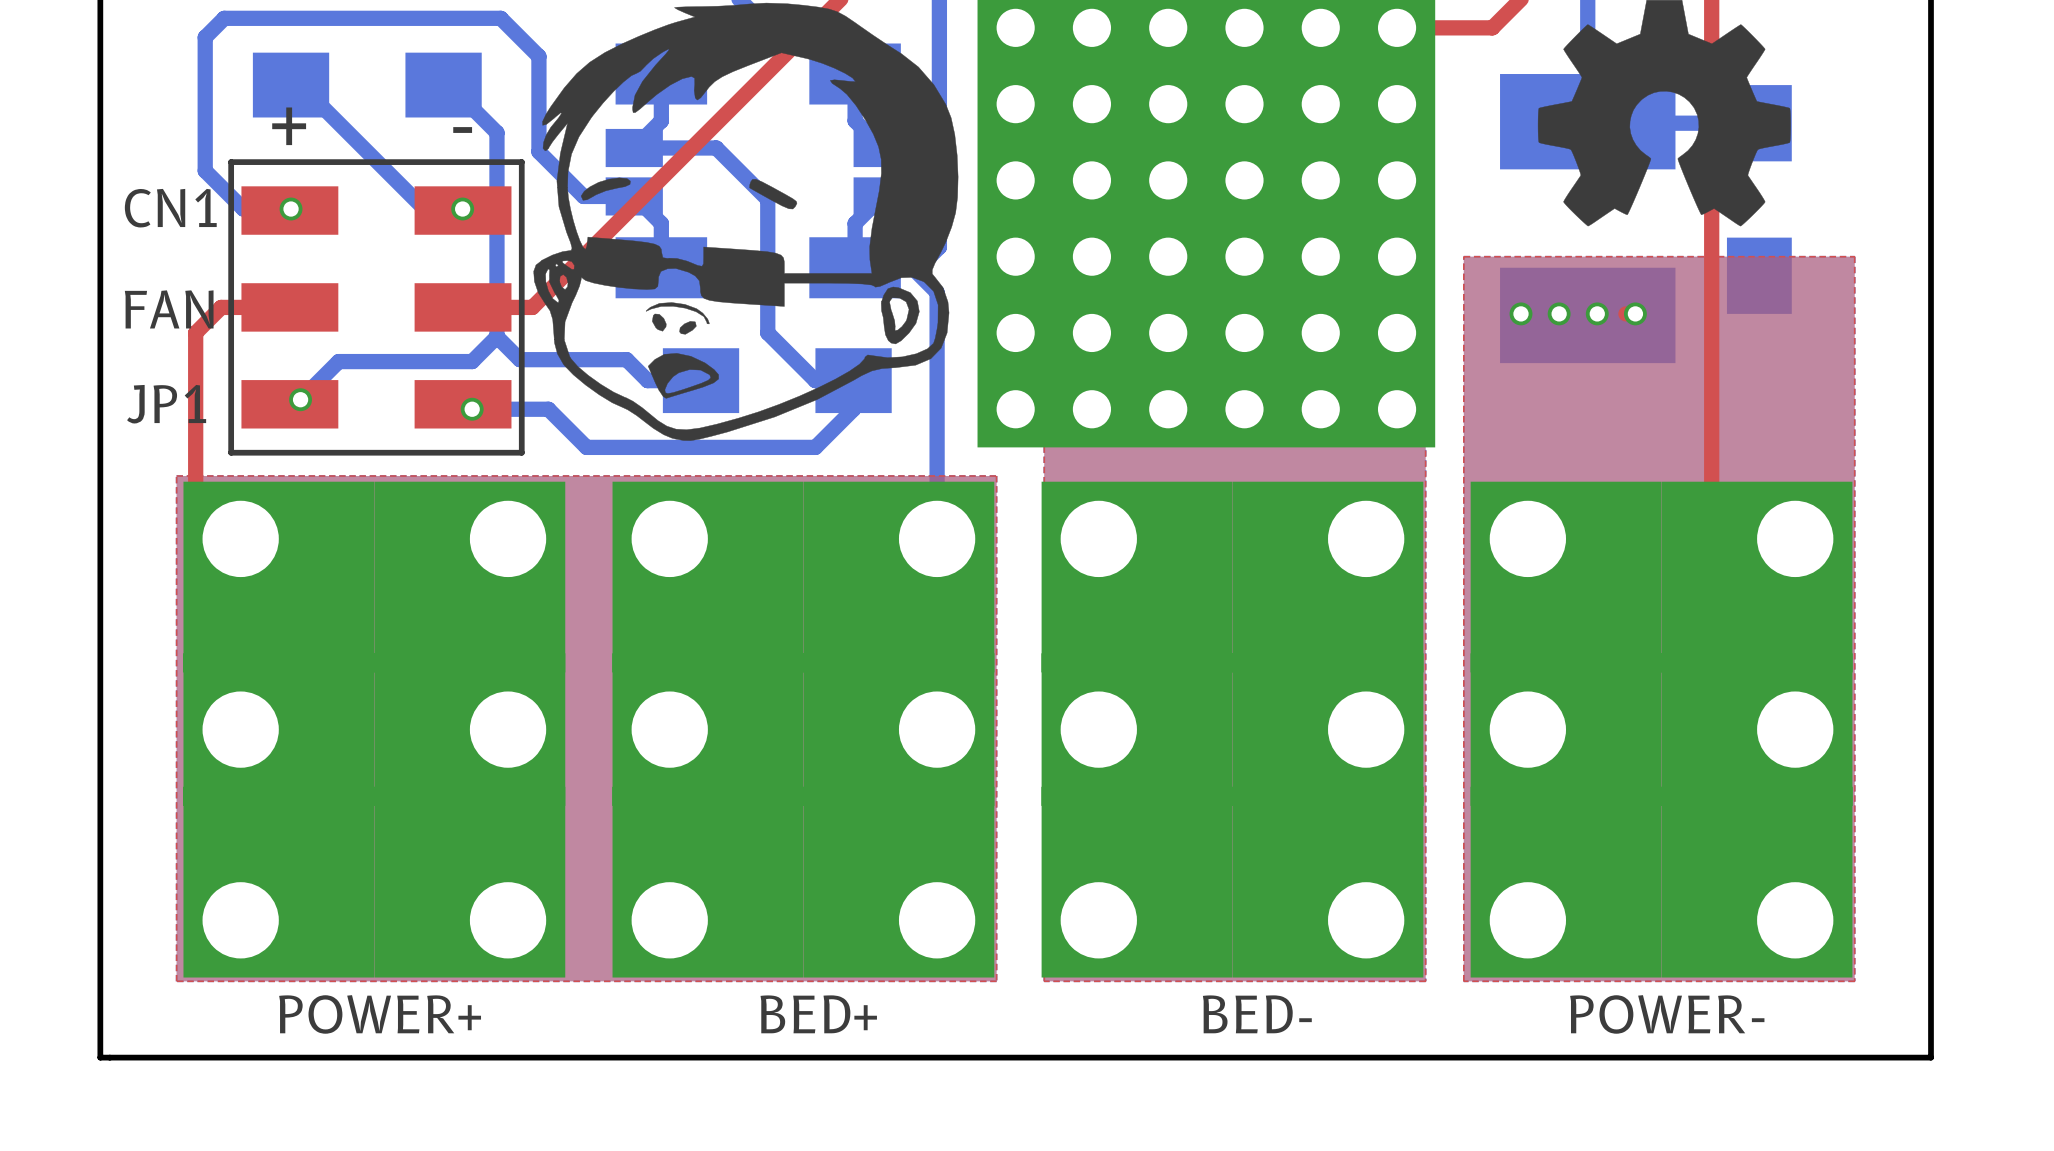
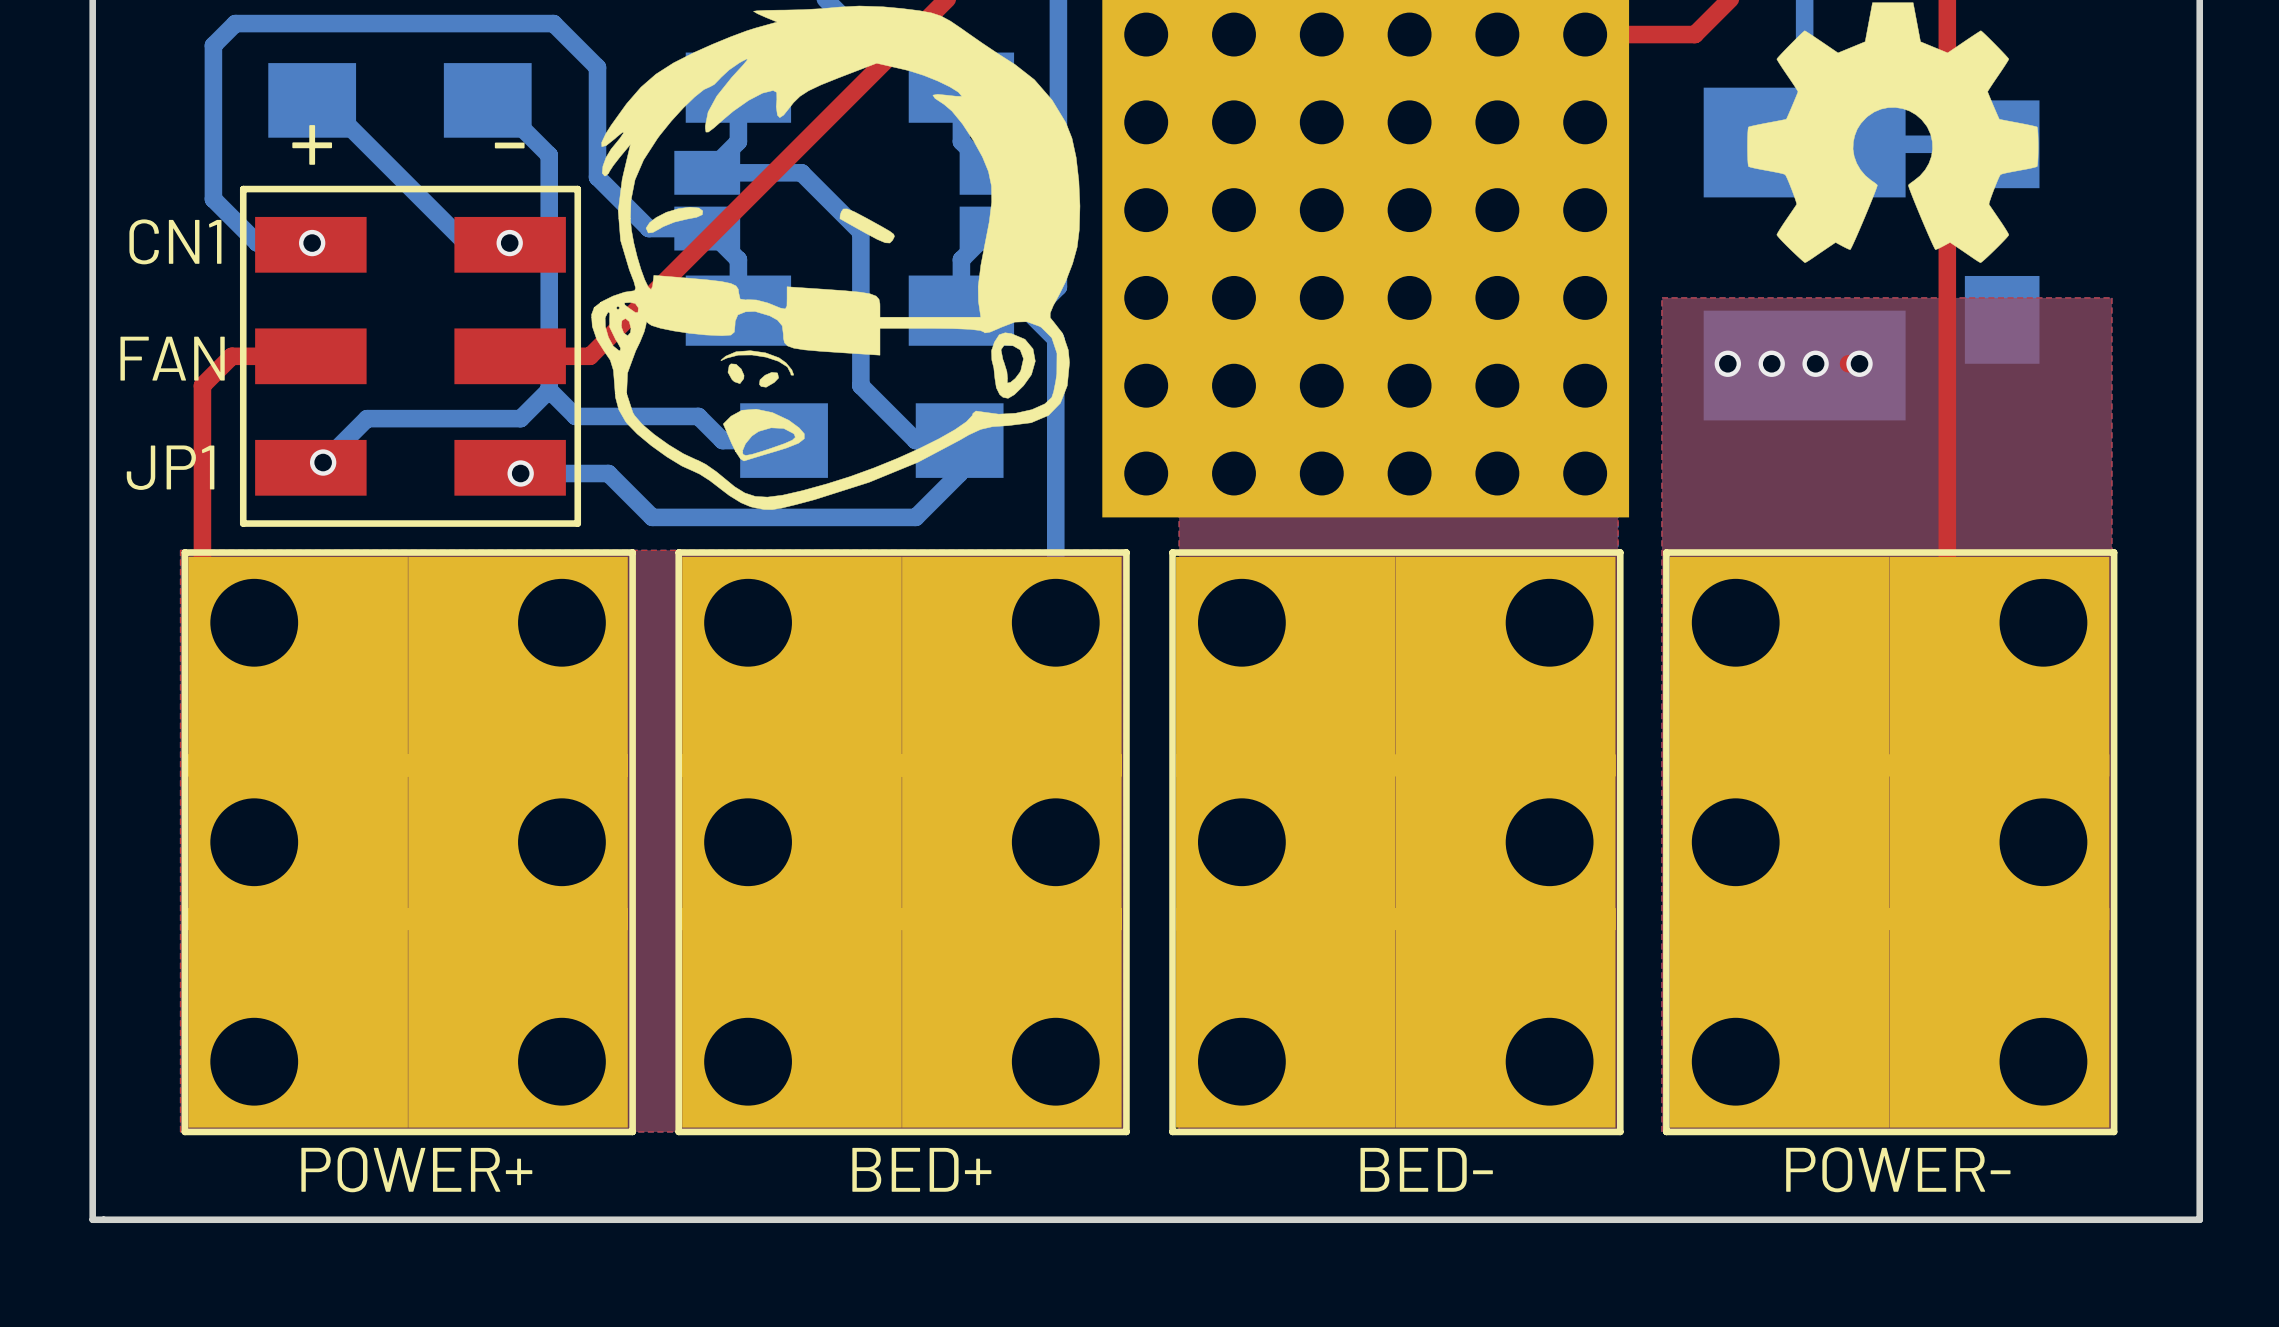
POWER+ footprint: [183, 481, 566, 978] -> [181, 549, 636, 1136]
BED+ footprint: [612, 481, 995, 978] -> [675, 549, 1130, 1136]
BED- footprint: [1041, 481, 1424, 978] -> [1169, 549, 1624, 1136]
POWER- footprint: [1470, 481, 1853, 978] -> [1663, 549, 2118, 1136]

